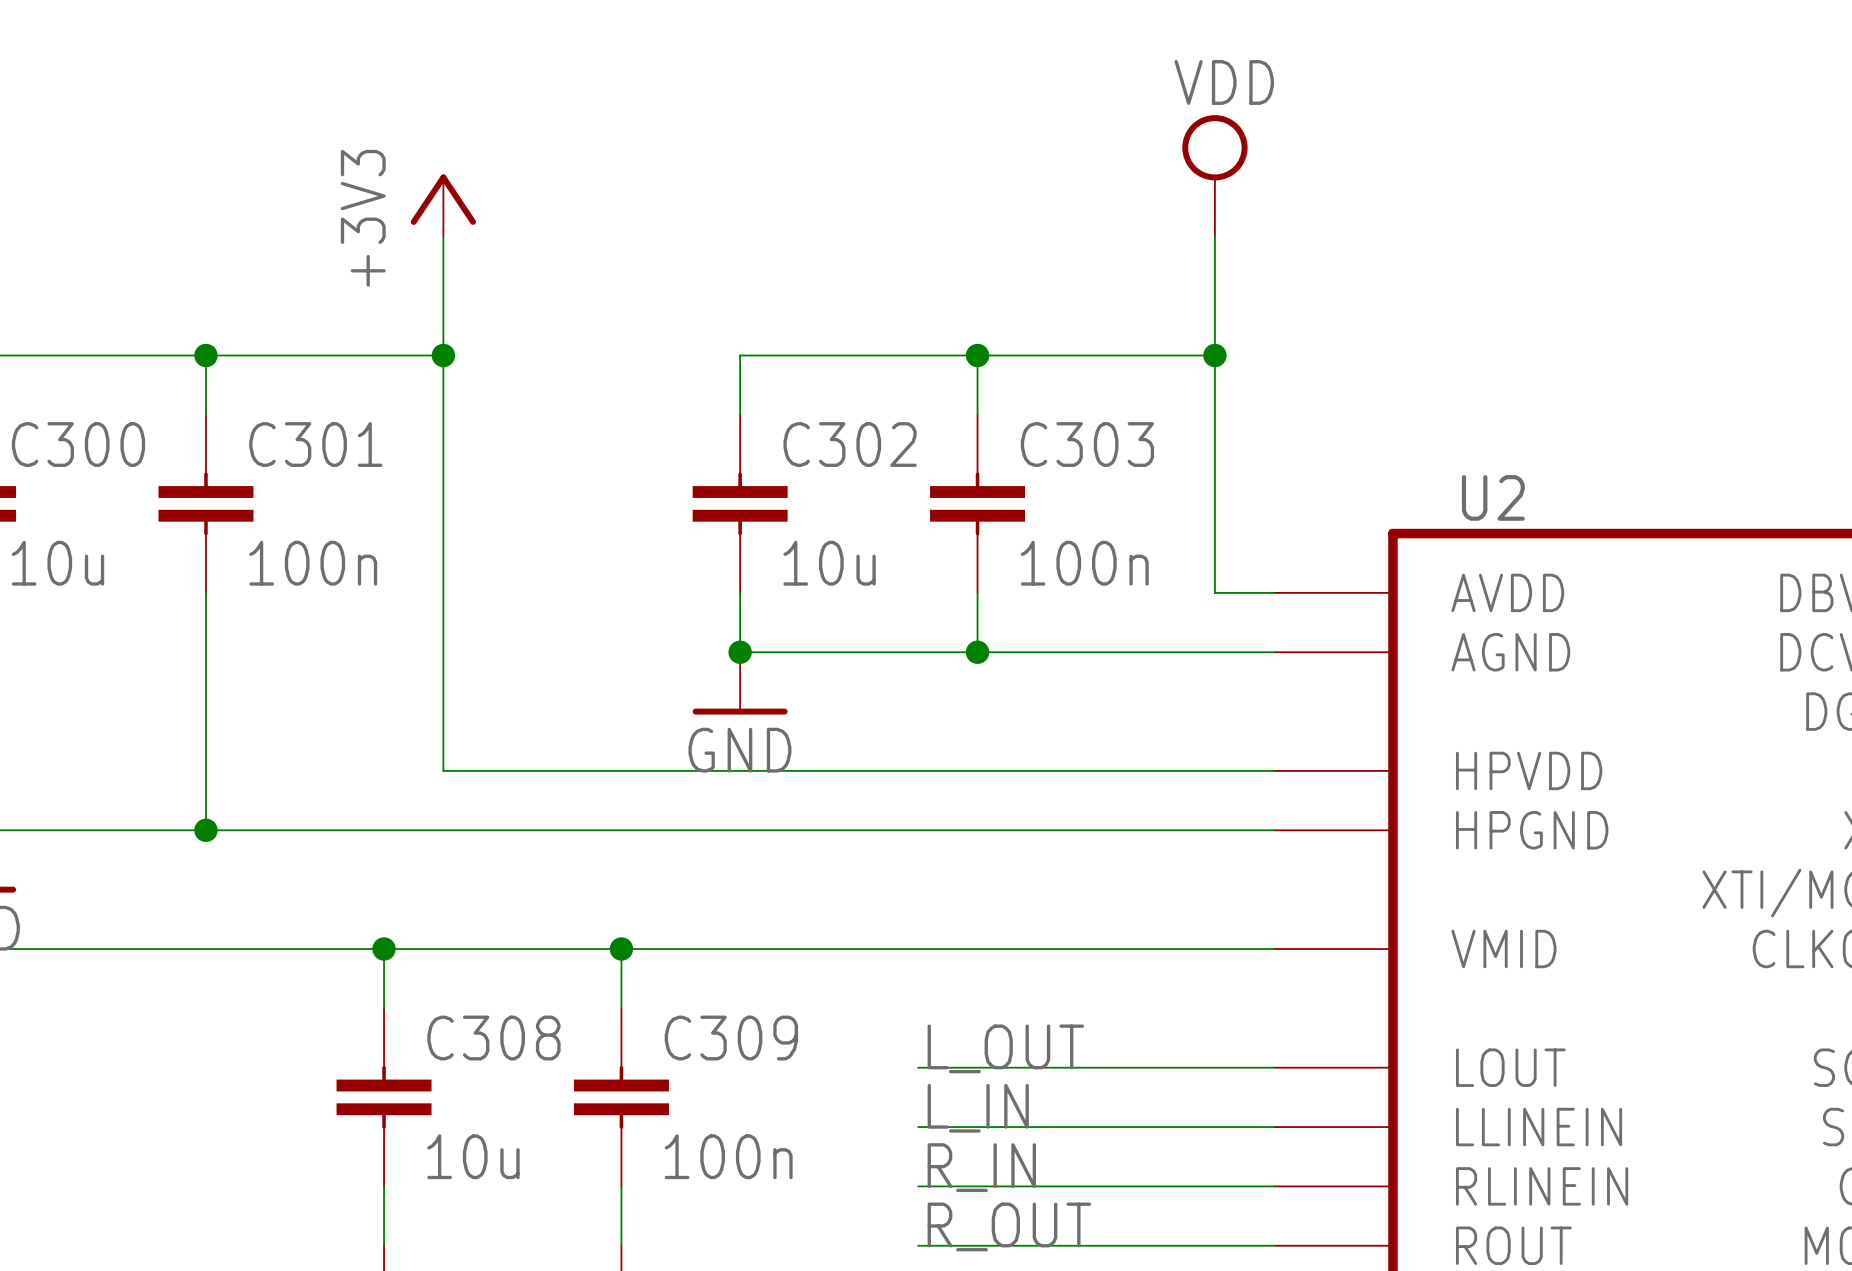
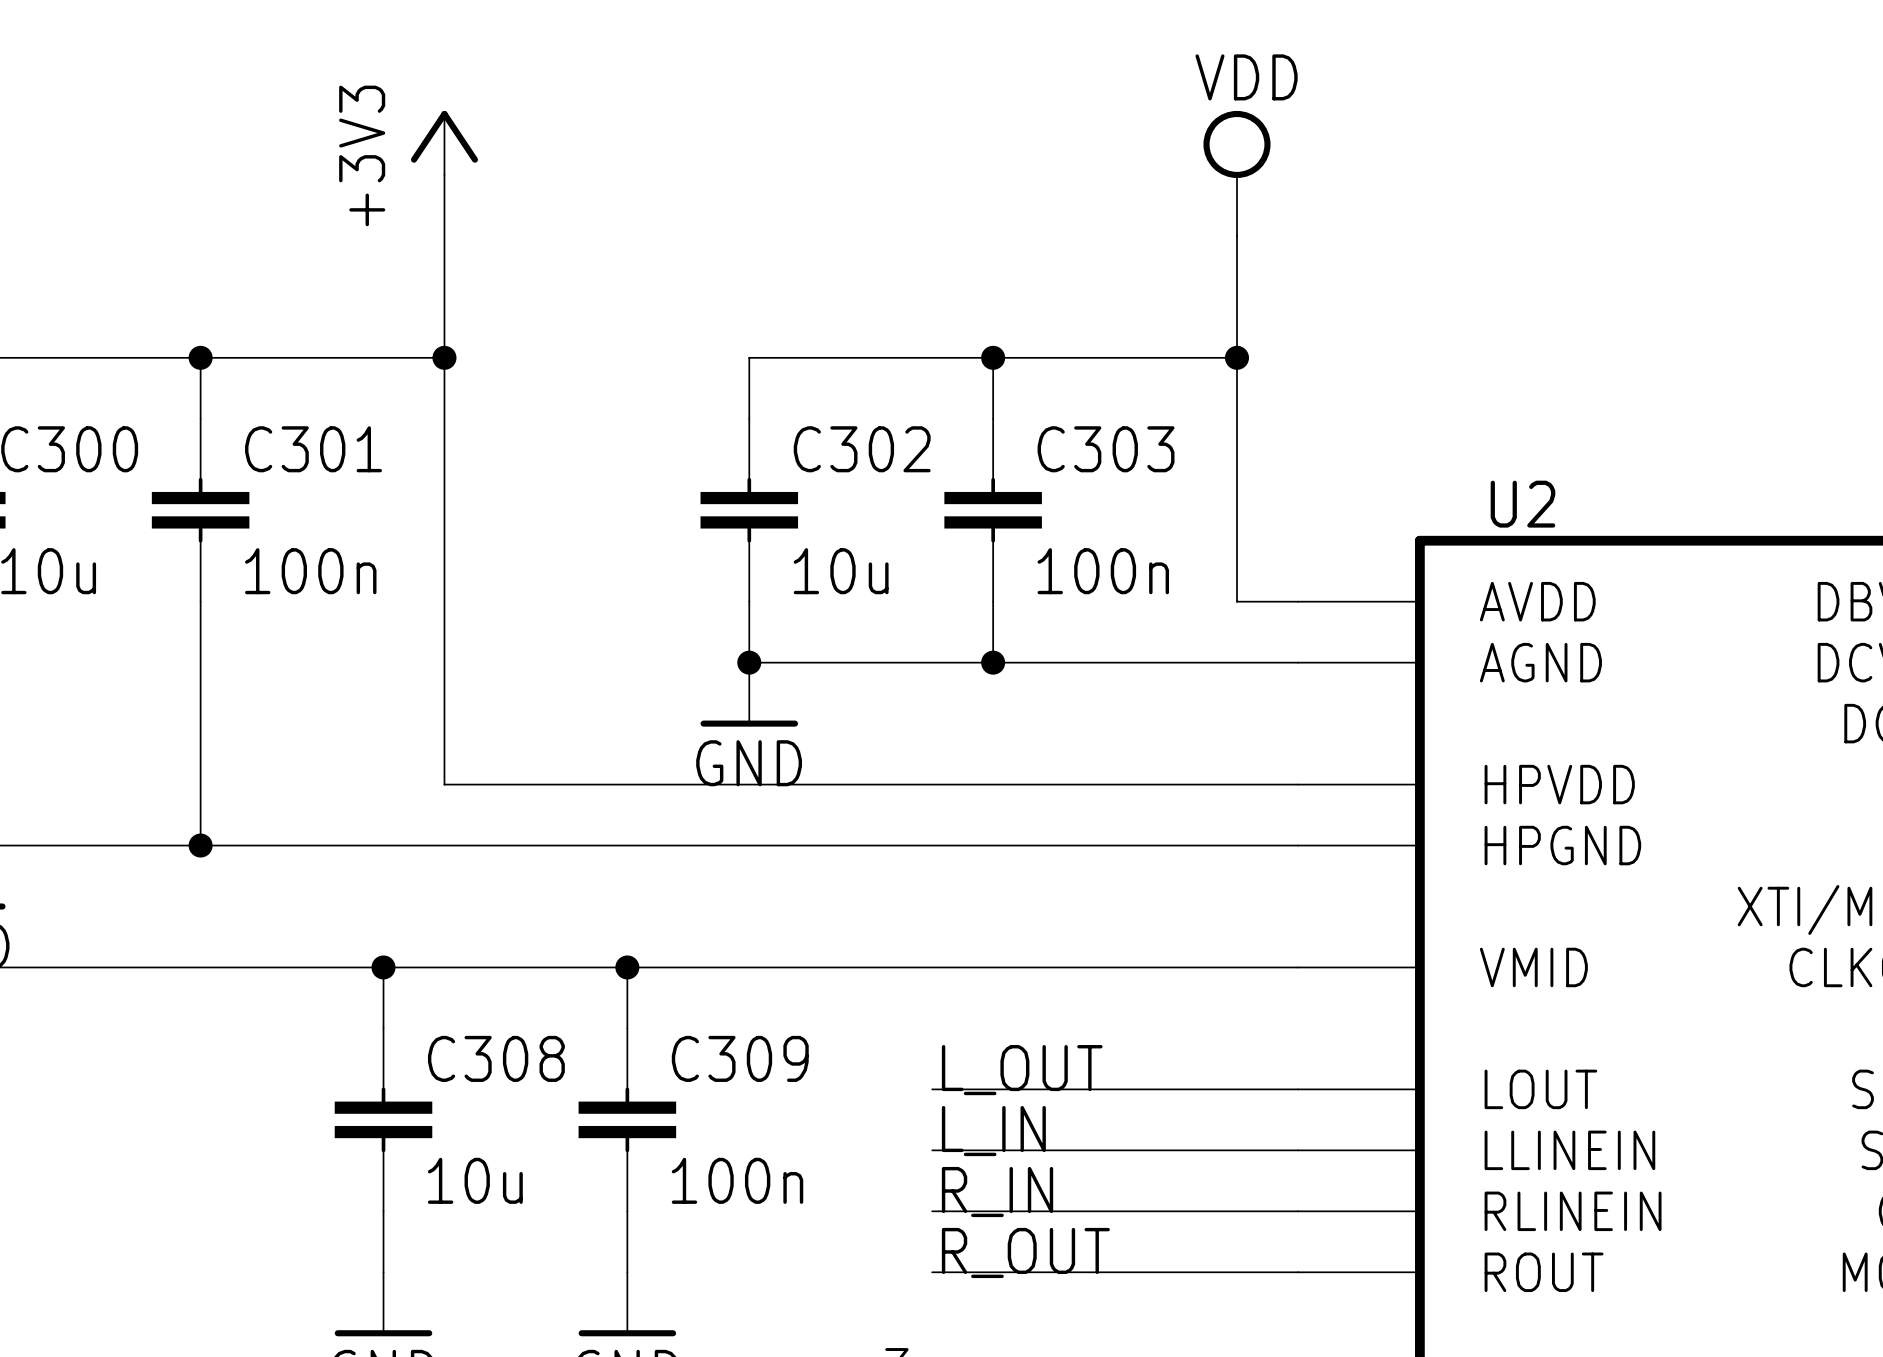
power symbol position: +3V3 (443, 205) -> +3V3 (444, 142)

